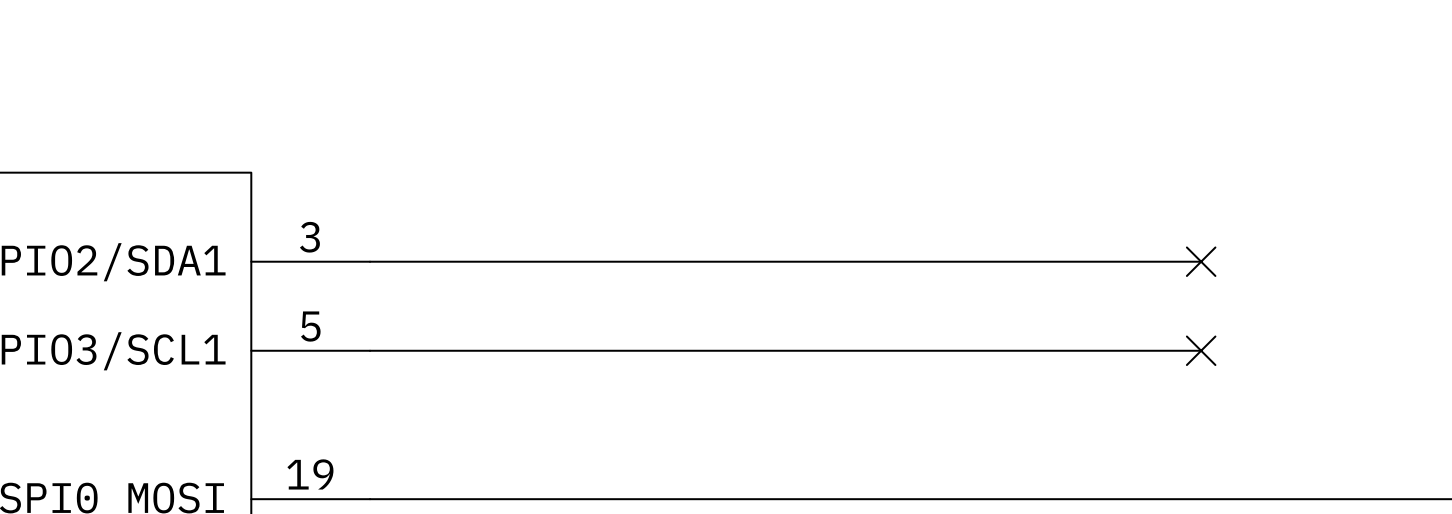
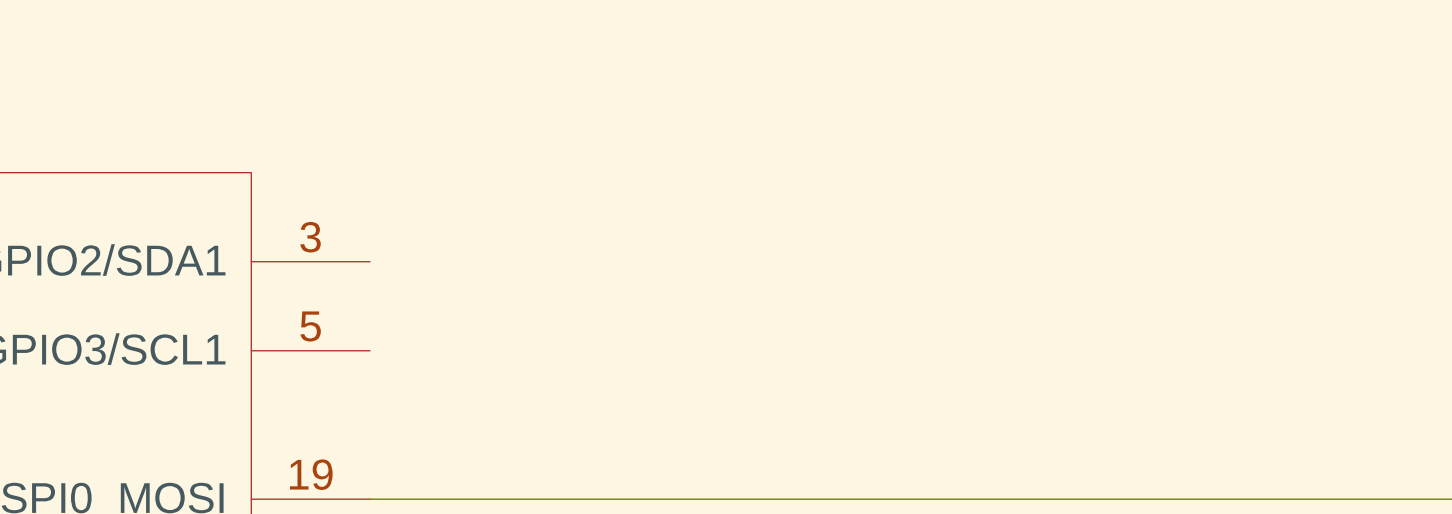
wire: (370, 261) (1201, 261) -> none
no-connect mark: (1201, 261) -> none
wire: (370, 350) (1201, 350) -> none
no-connect mark: (1201, 350) -> none

